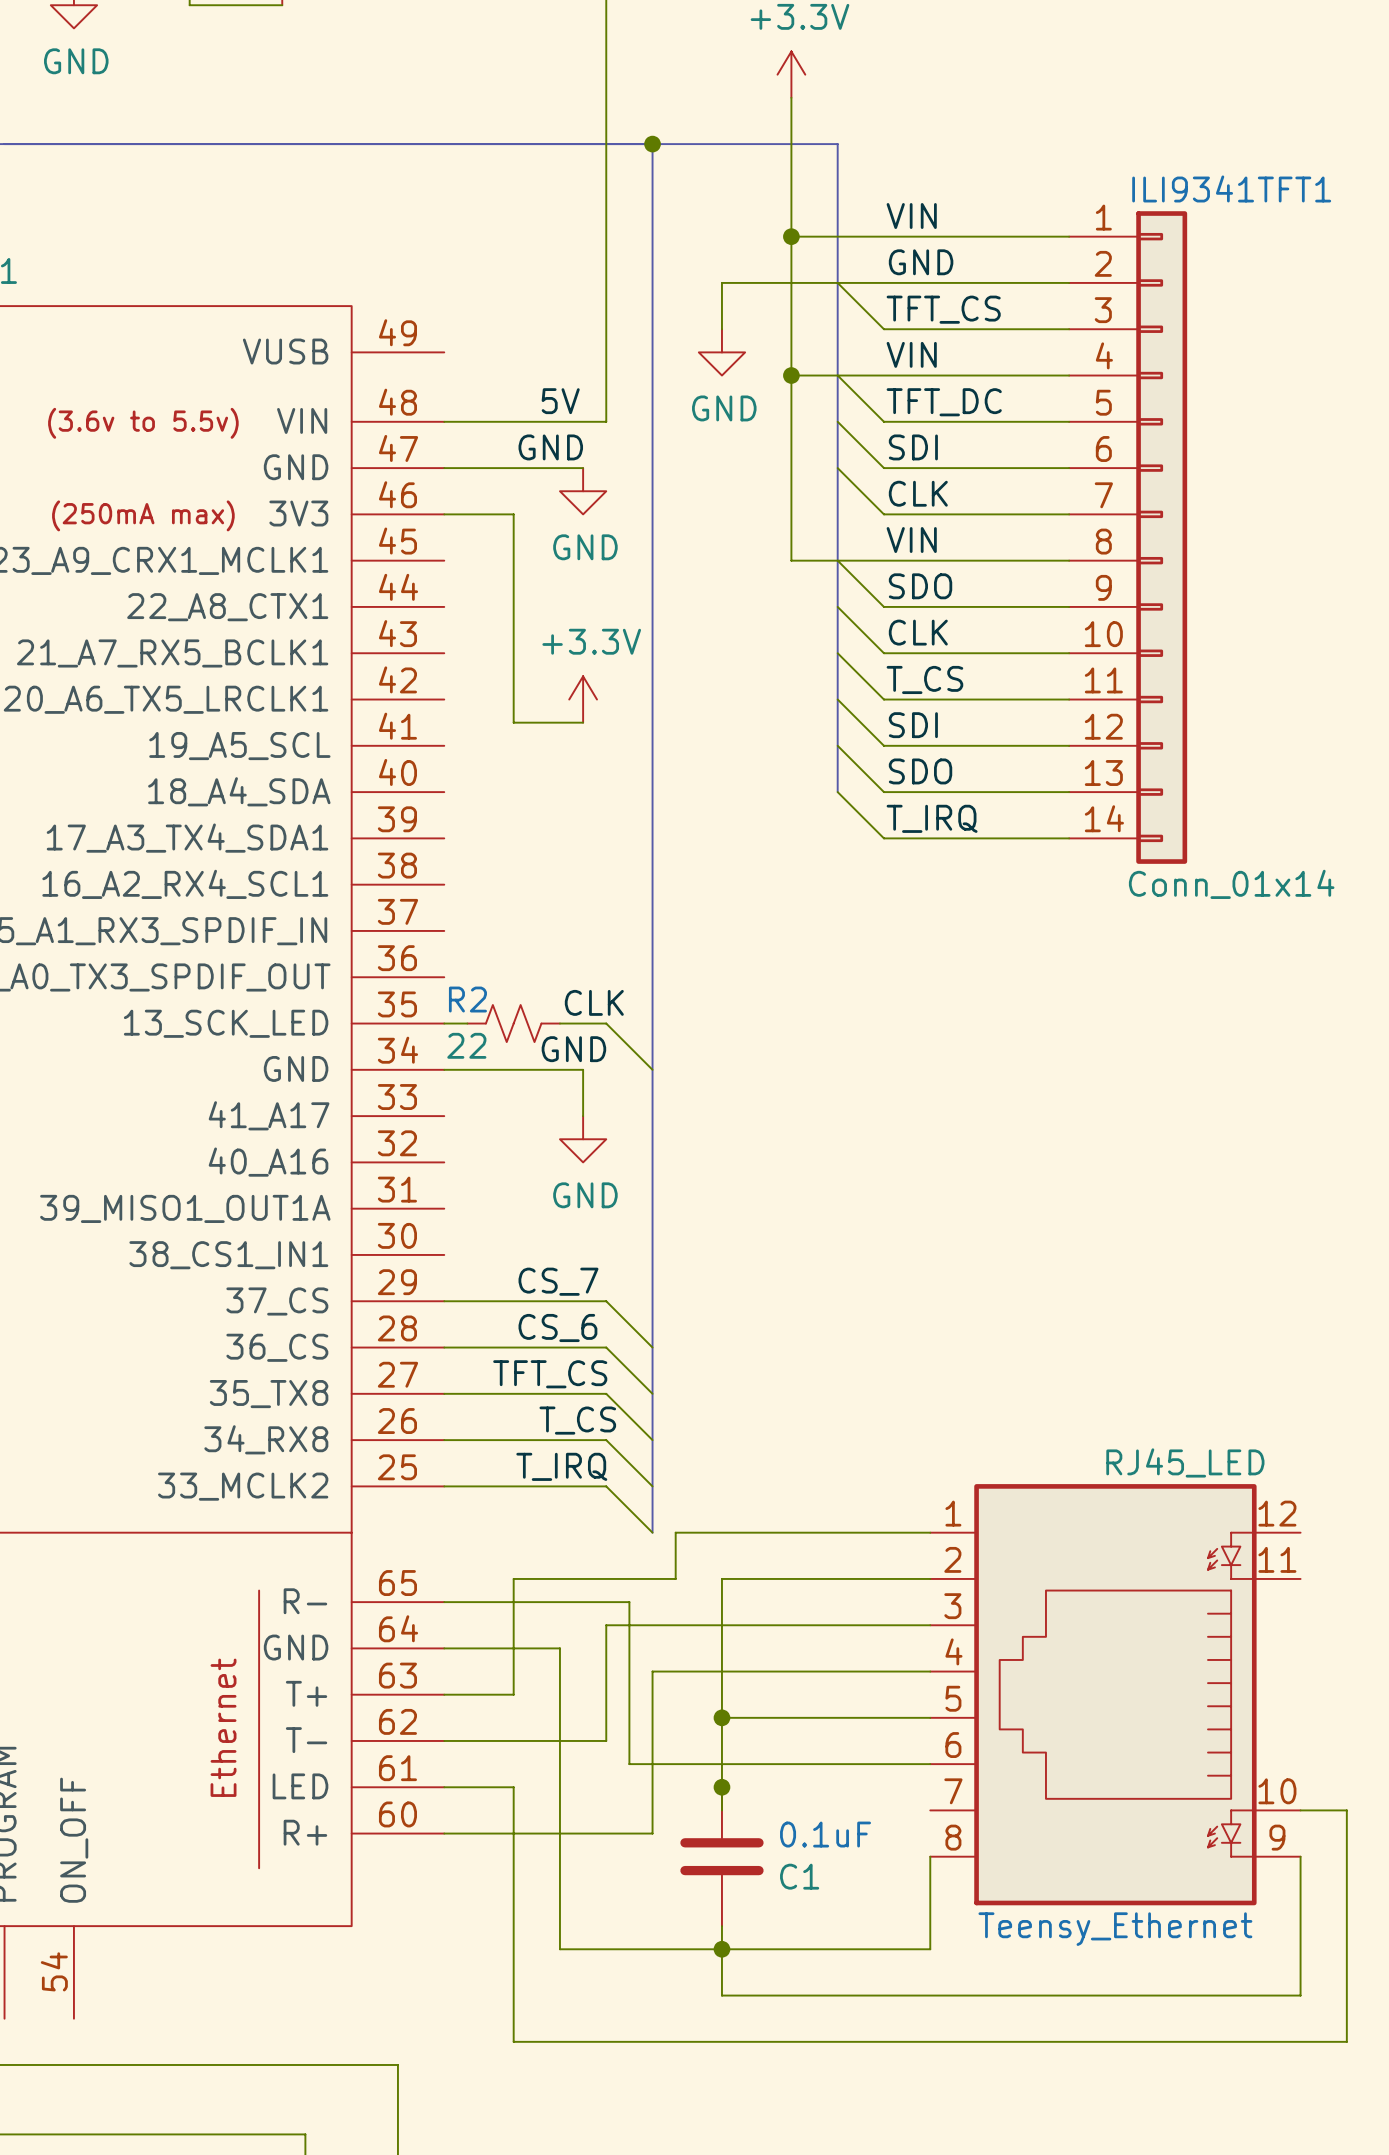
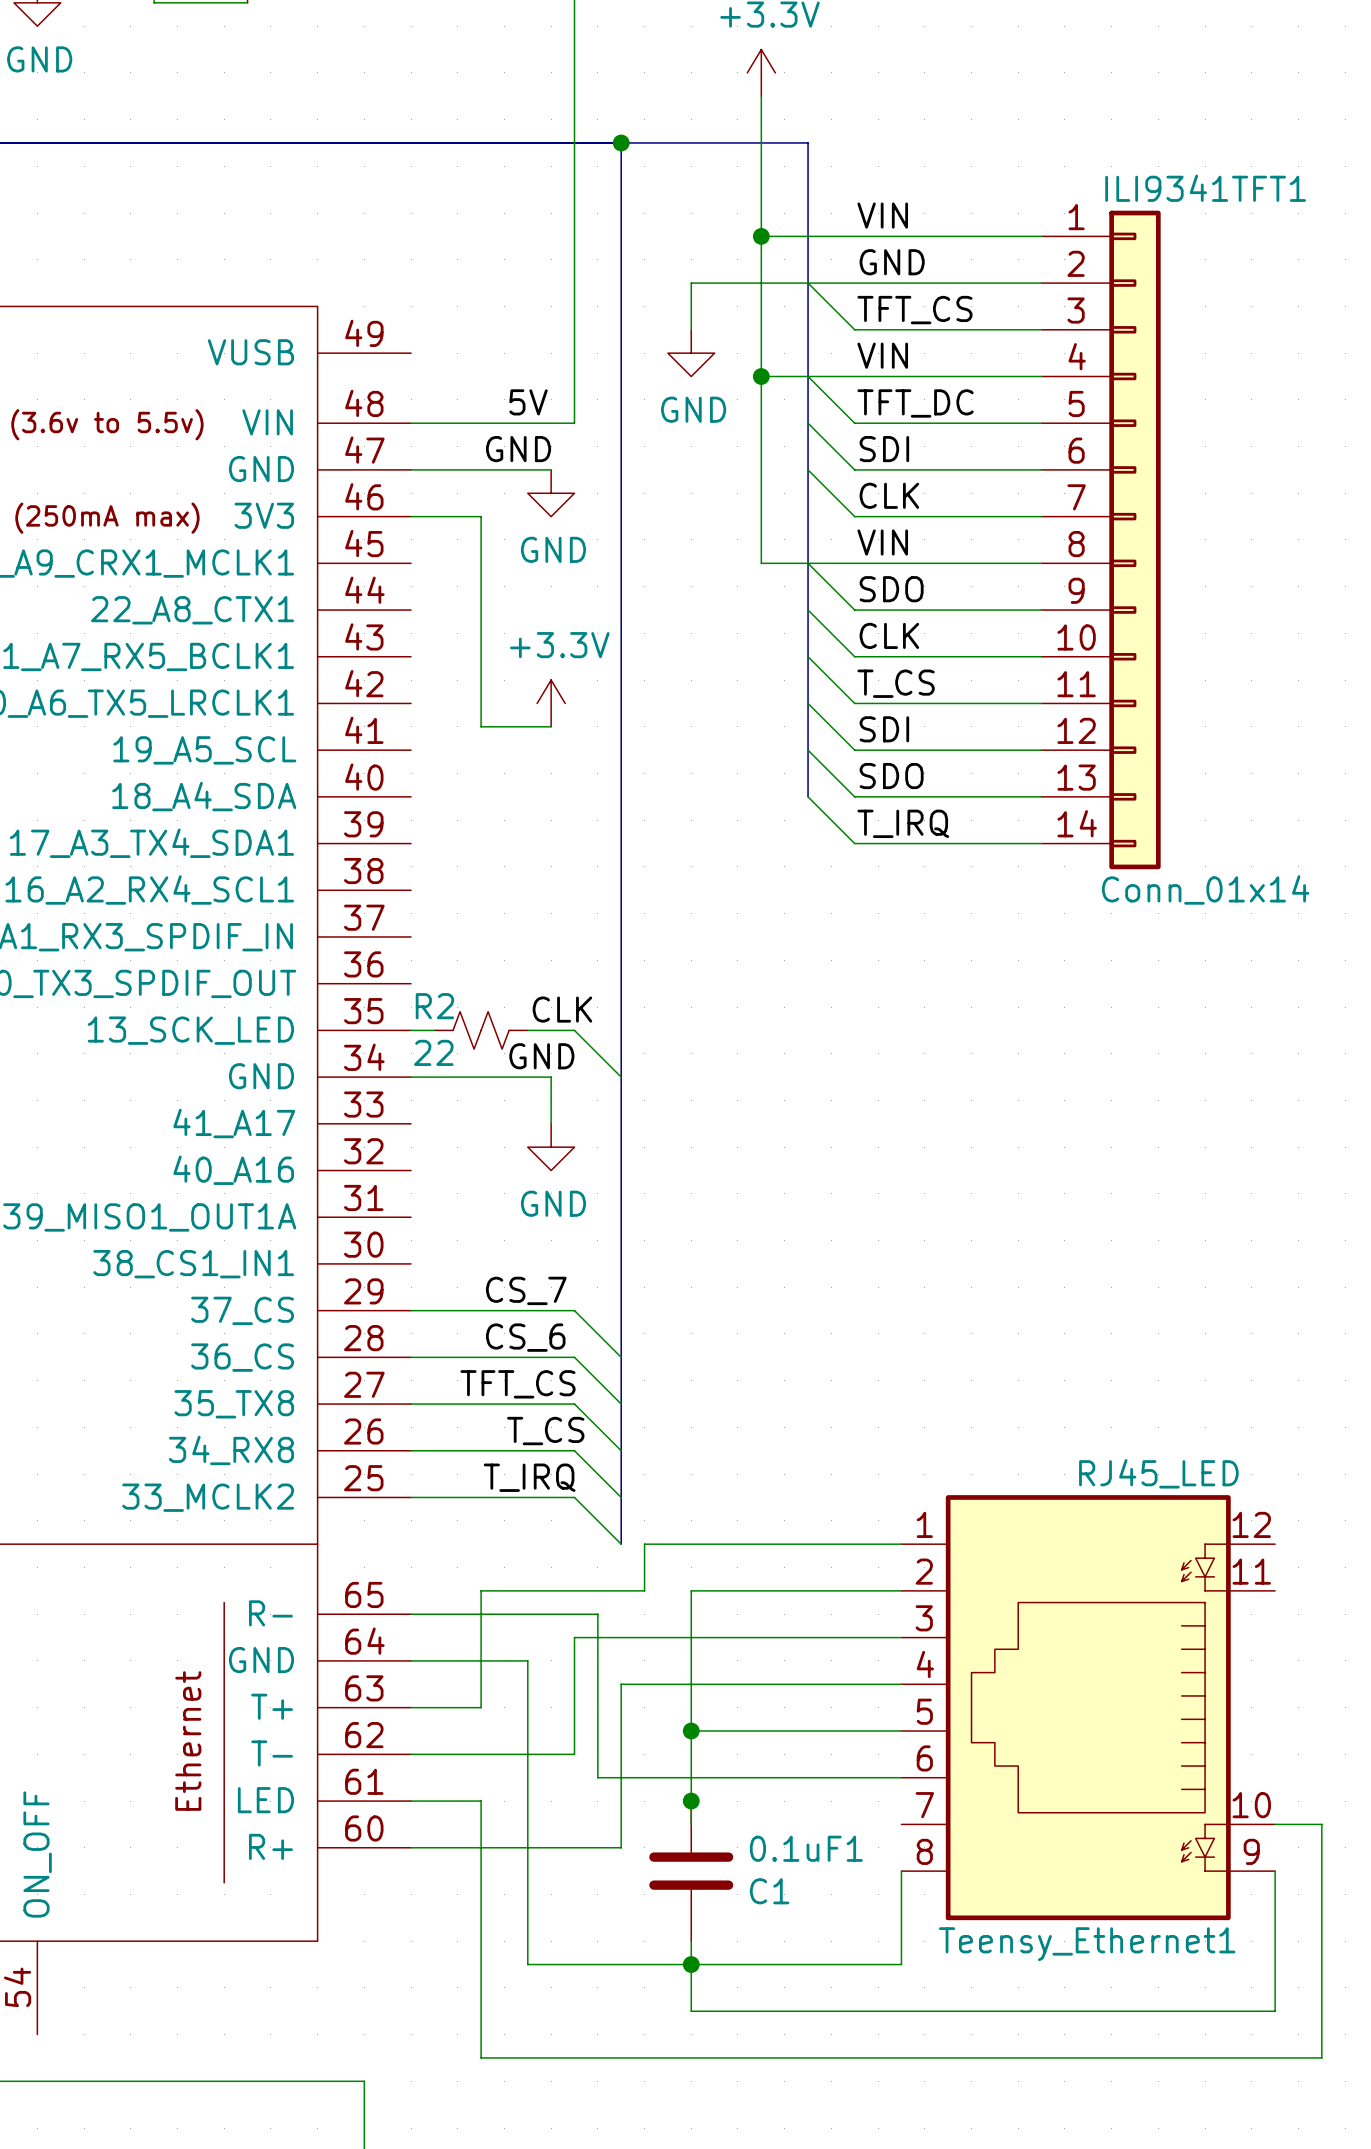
0.1uF name: 0.1uF (825, 1834) -> 0.1uF1 (806, 1848)
Teensy_Ethernet name: Teensy_Ethernet (1115, 1929) -> Teensy_Ethernet1 (1087, 1944)

